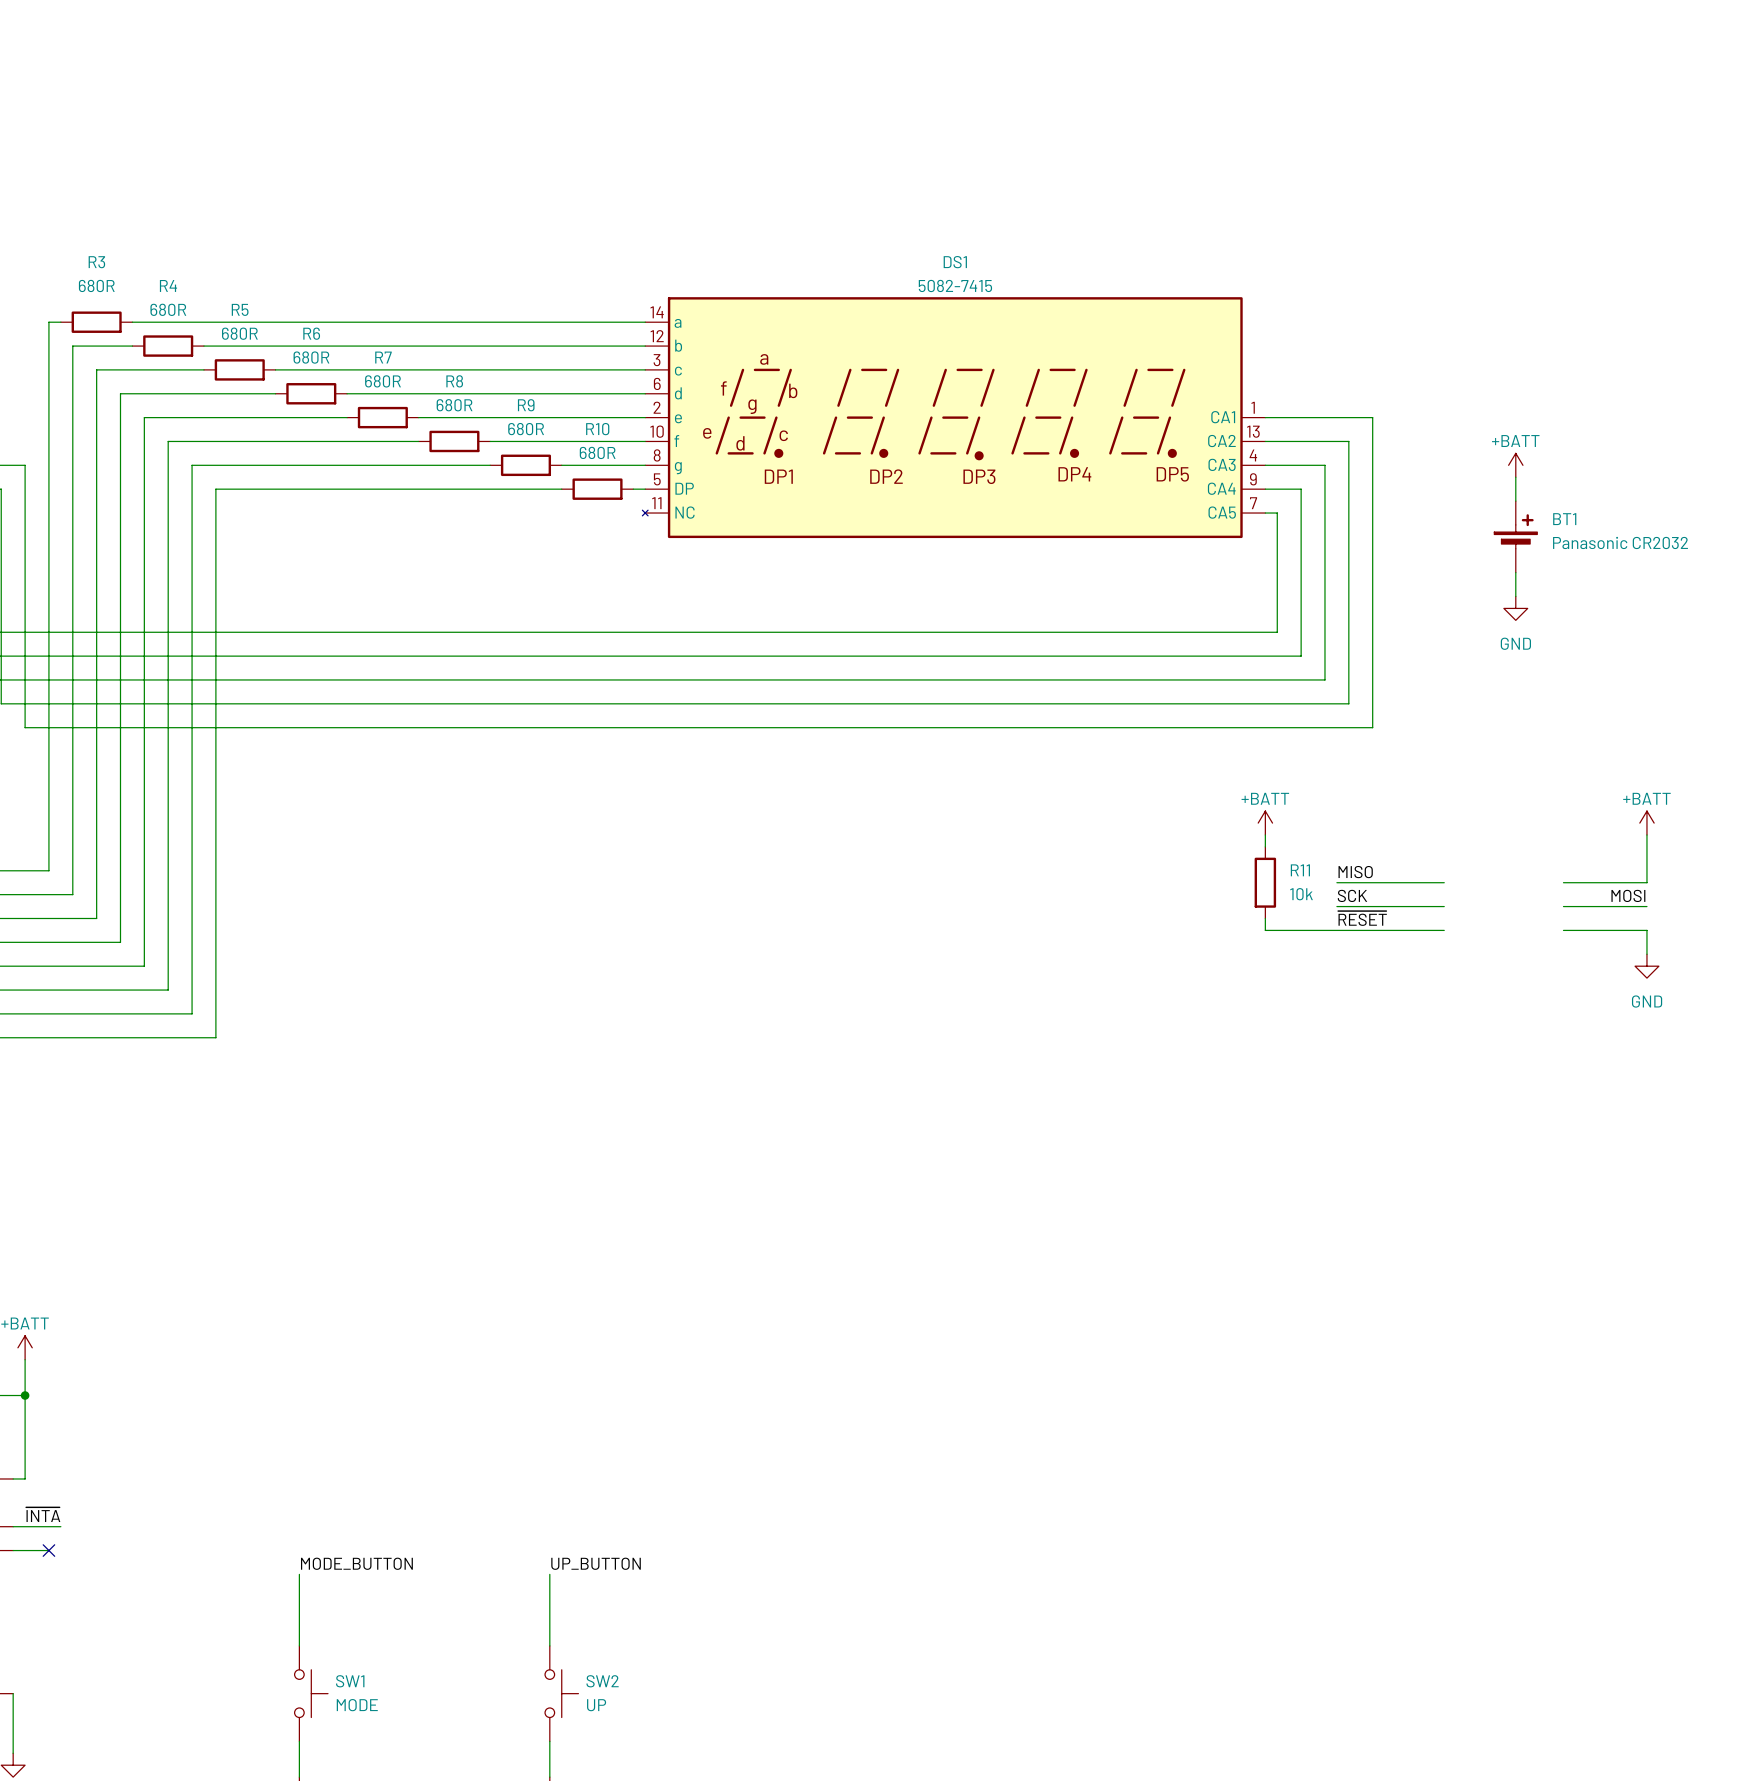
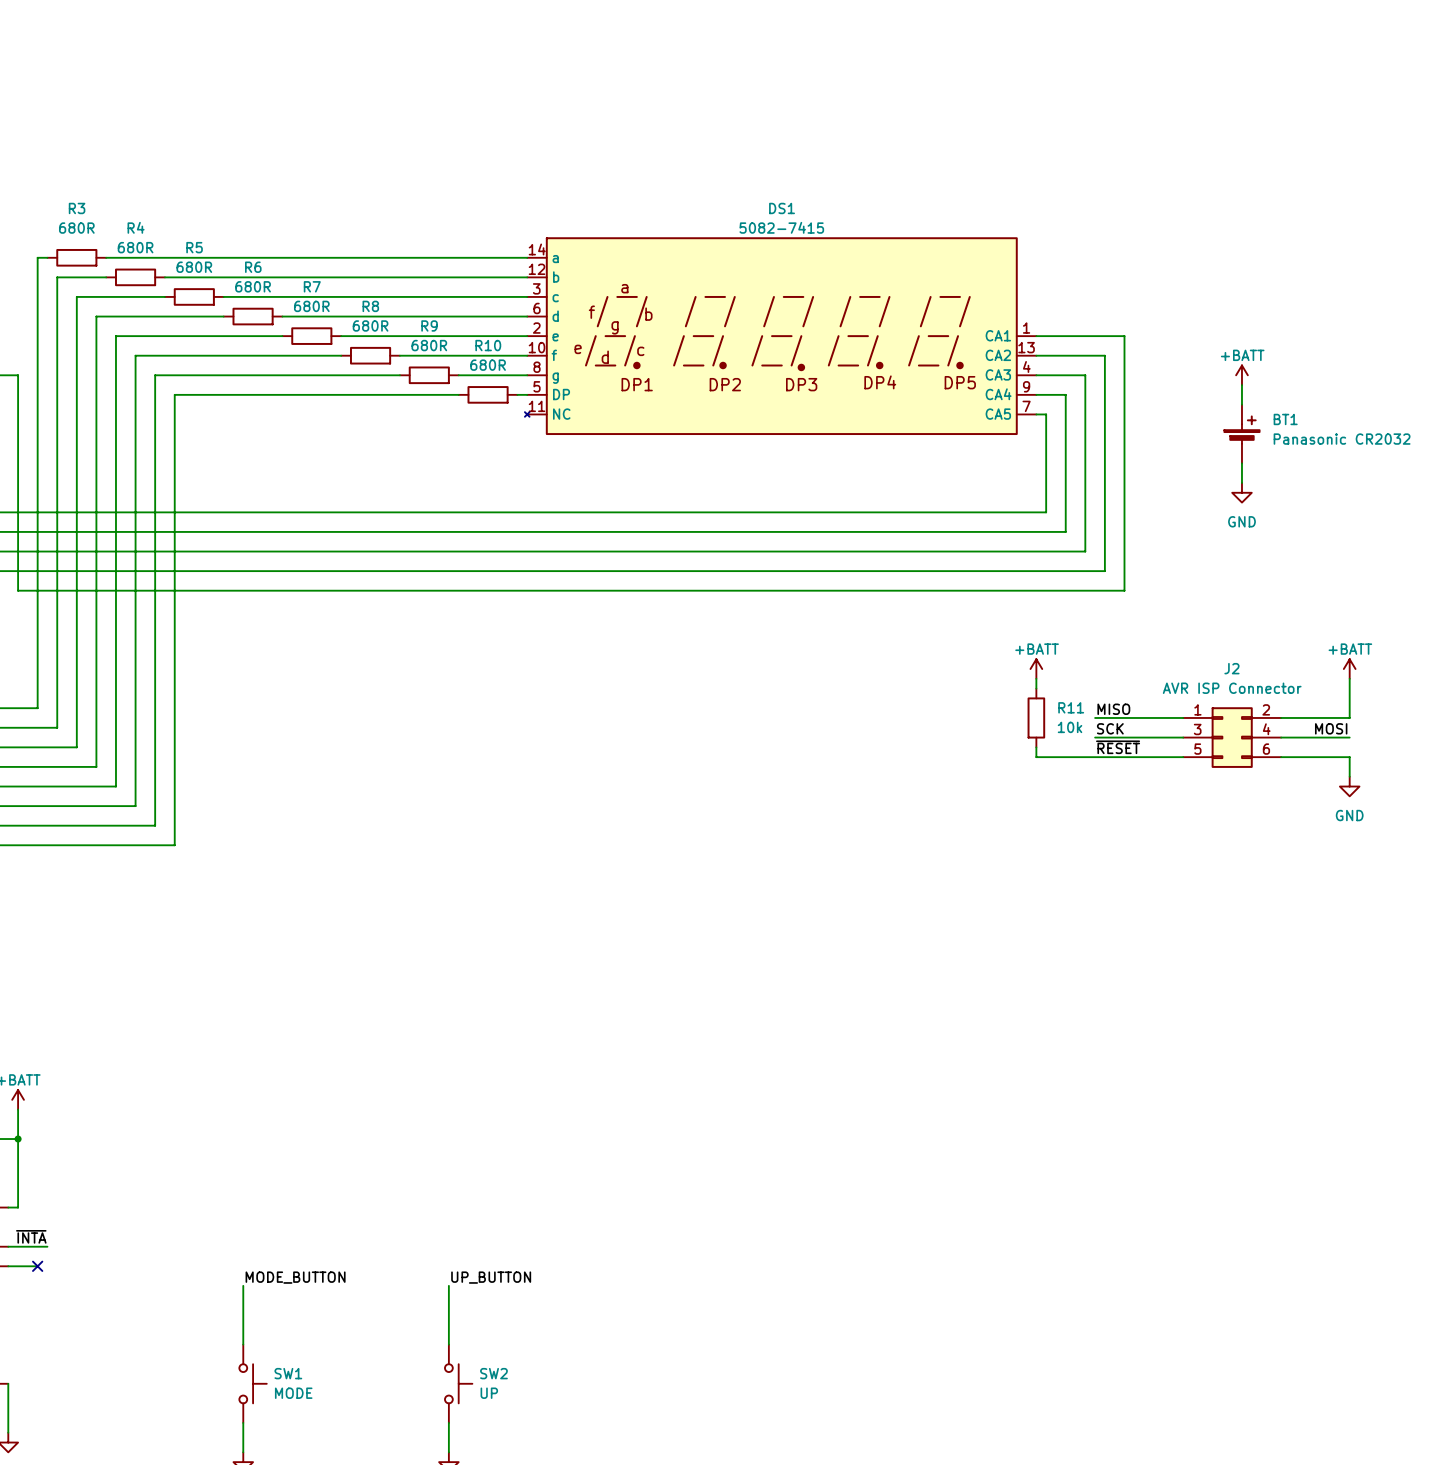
J2: none -> AVR ISP Connector (1232, 737)

